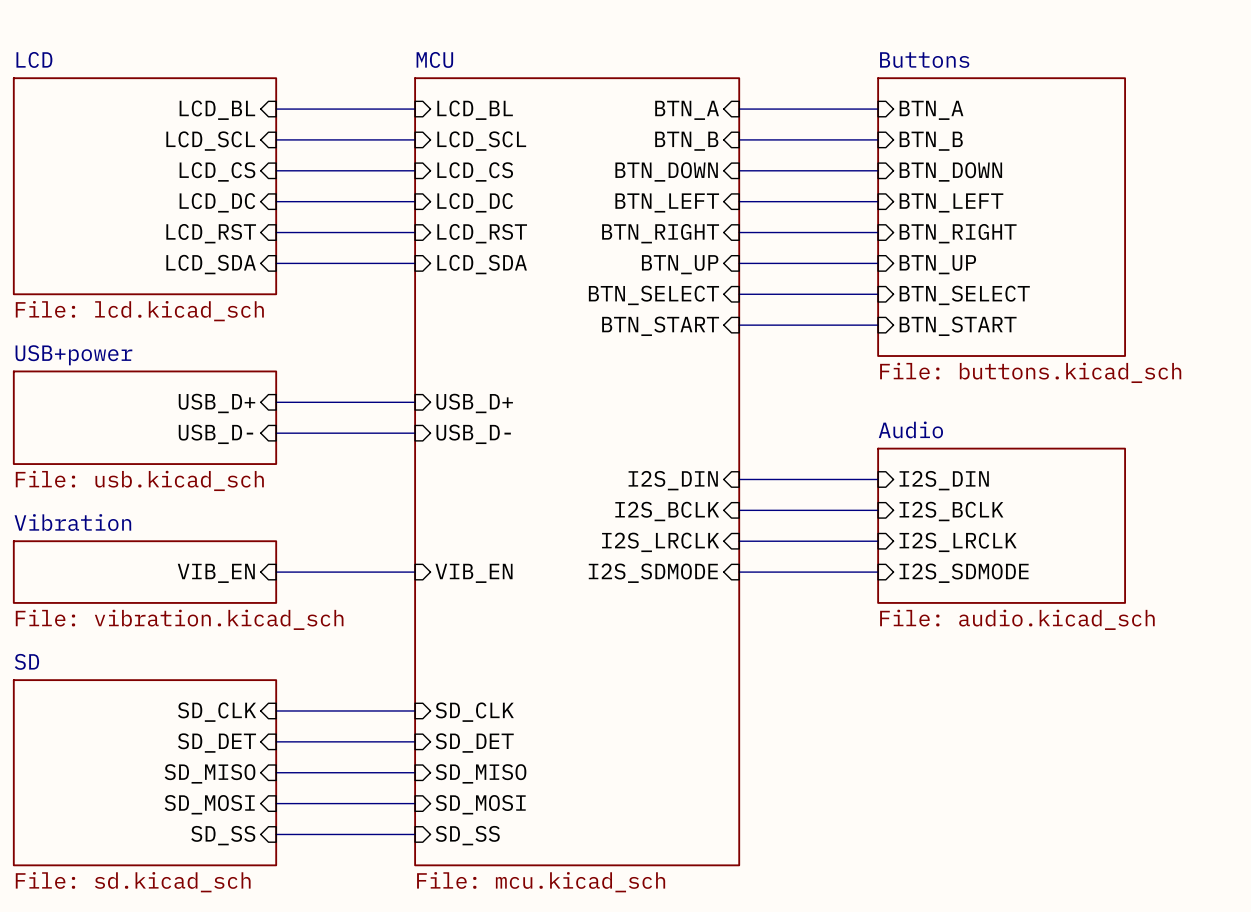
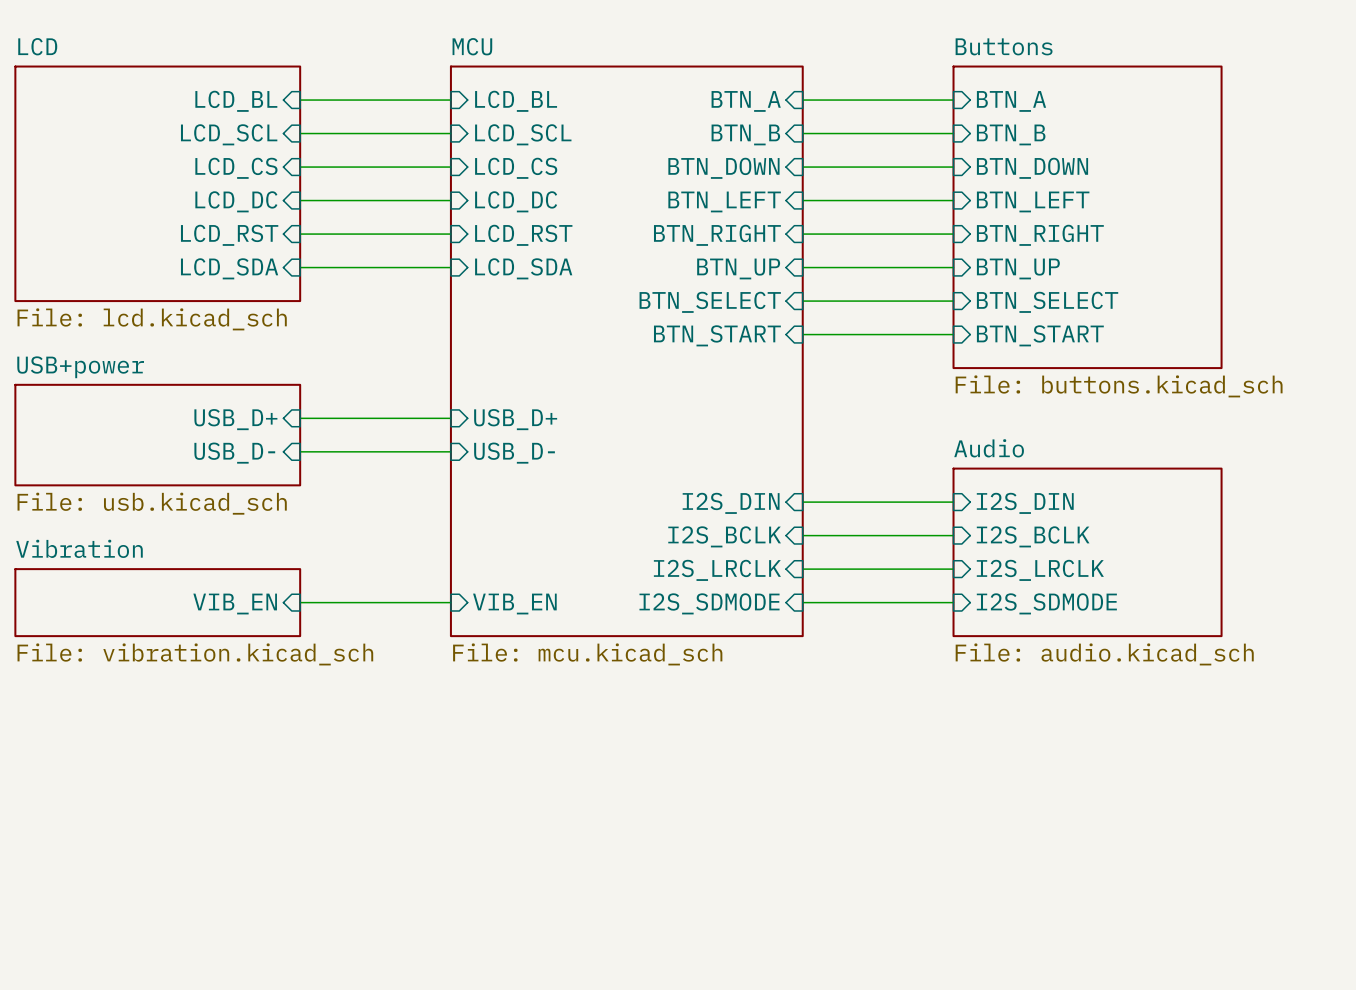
sheet MCU: none -> File: mcu.kicad_sch (626, 351)
sheet MCU: File: mcu.kicad_sch (577, 471) -> none
wire: (276, 710) (415, 710) -> none
sheet pin: SD_CLK (217, 712) -> none
sheet pin: SD_CLK (474, 712) -> none
wire: (276, 741) (415, 741) -> none
sheet pin: SD_DET (217, 743) -> none
sheet pin: SD_DET (474, 743) -> none
sheet SD: File: sd.kicad_sch (144, 772) -> none
wire: (276, 772) (415, 772) -> none
sheet pin: SD_MISO (210, 773) -> none
sheet pin: SD_MISO (481, 773) -> none
wire: (276, 803) (415, 803) -> none
sheet pin: SD_MOSI (209, 804) -> none
sheet pin: SD_MOSI (480, 804) -> none
wire: (276, 834) (415, 834) -> none
sheet pin: SD_SS (223, 835) -> none
sheet pin: SD_SS (467, 835) -> none

